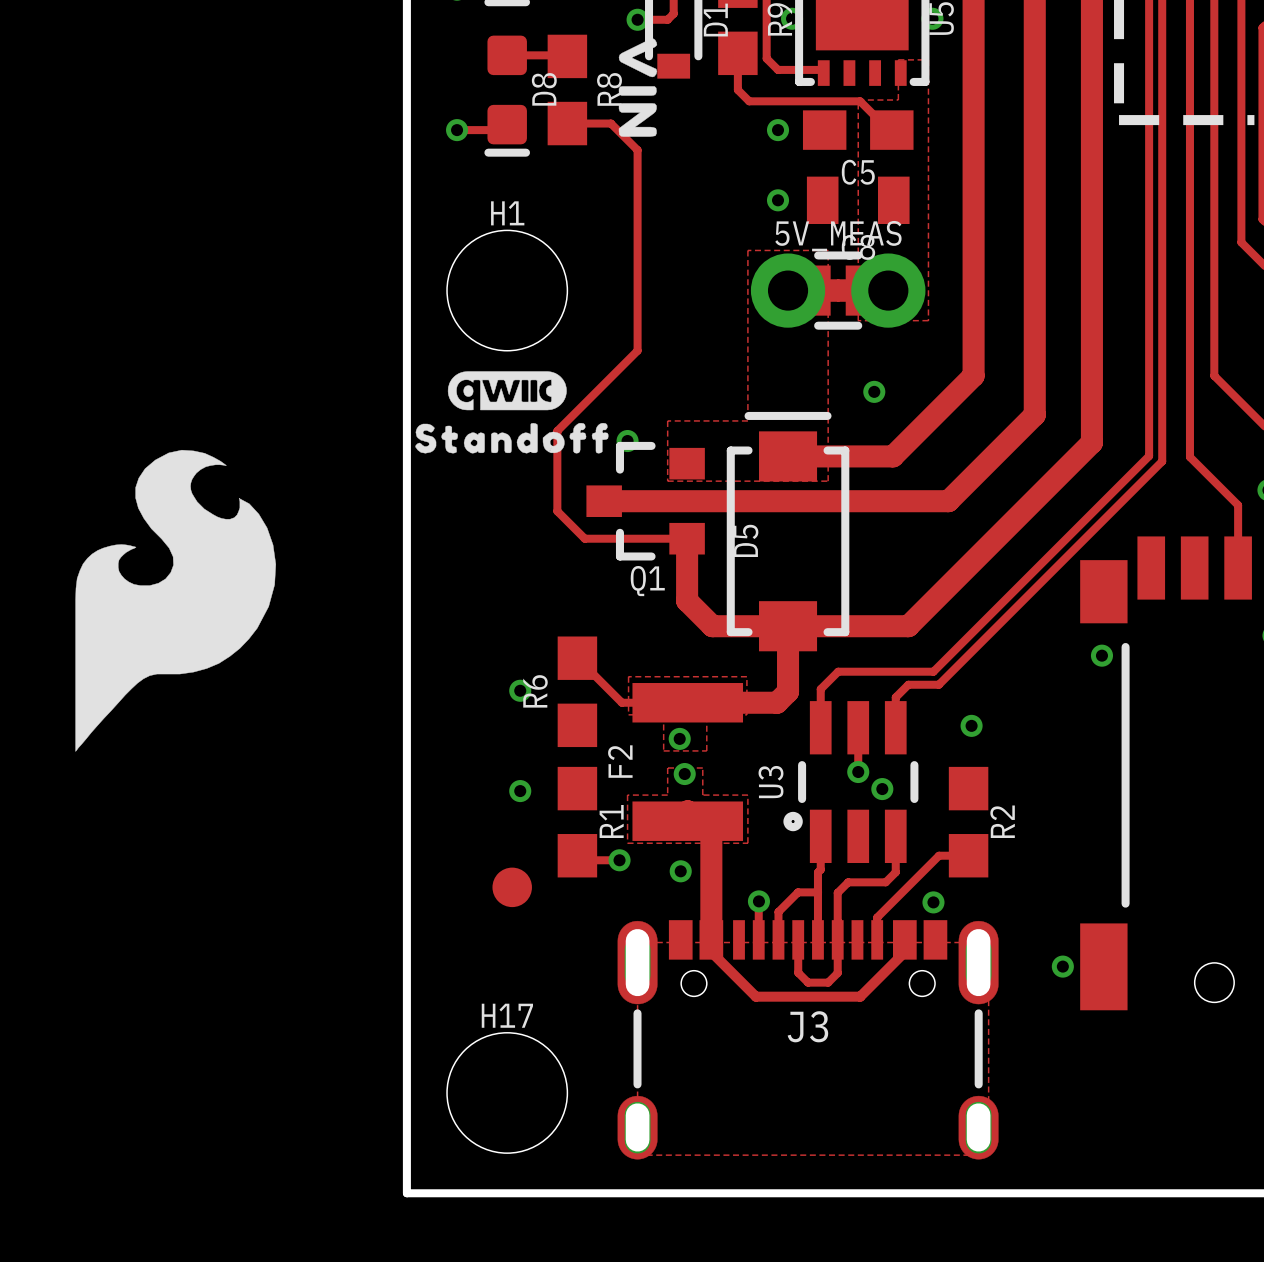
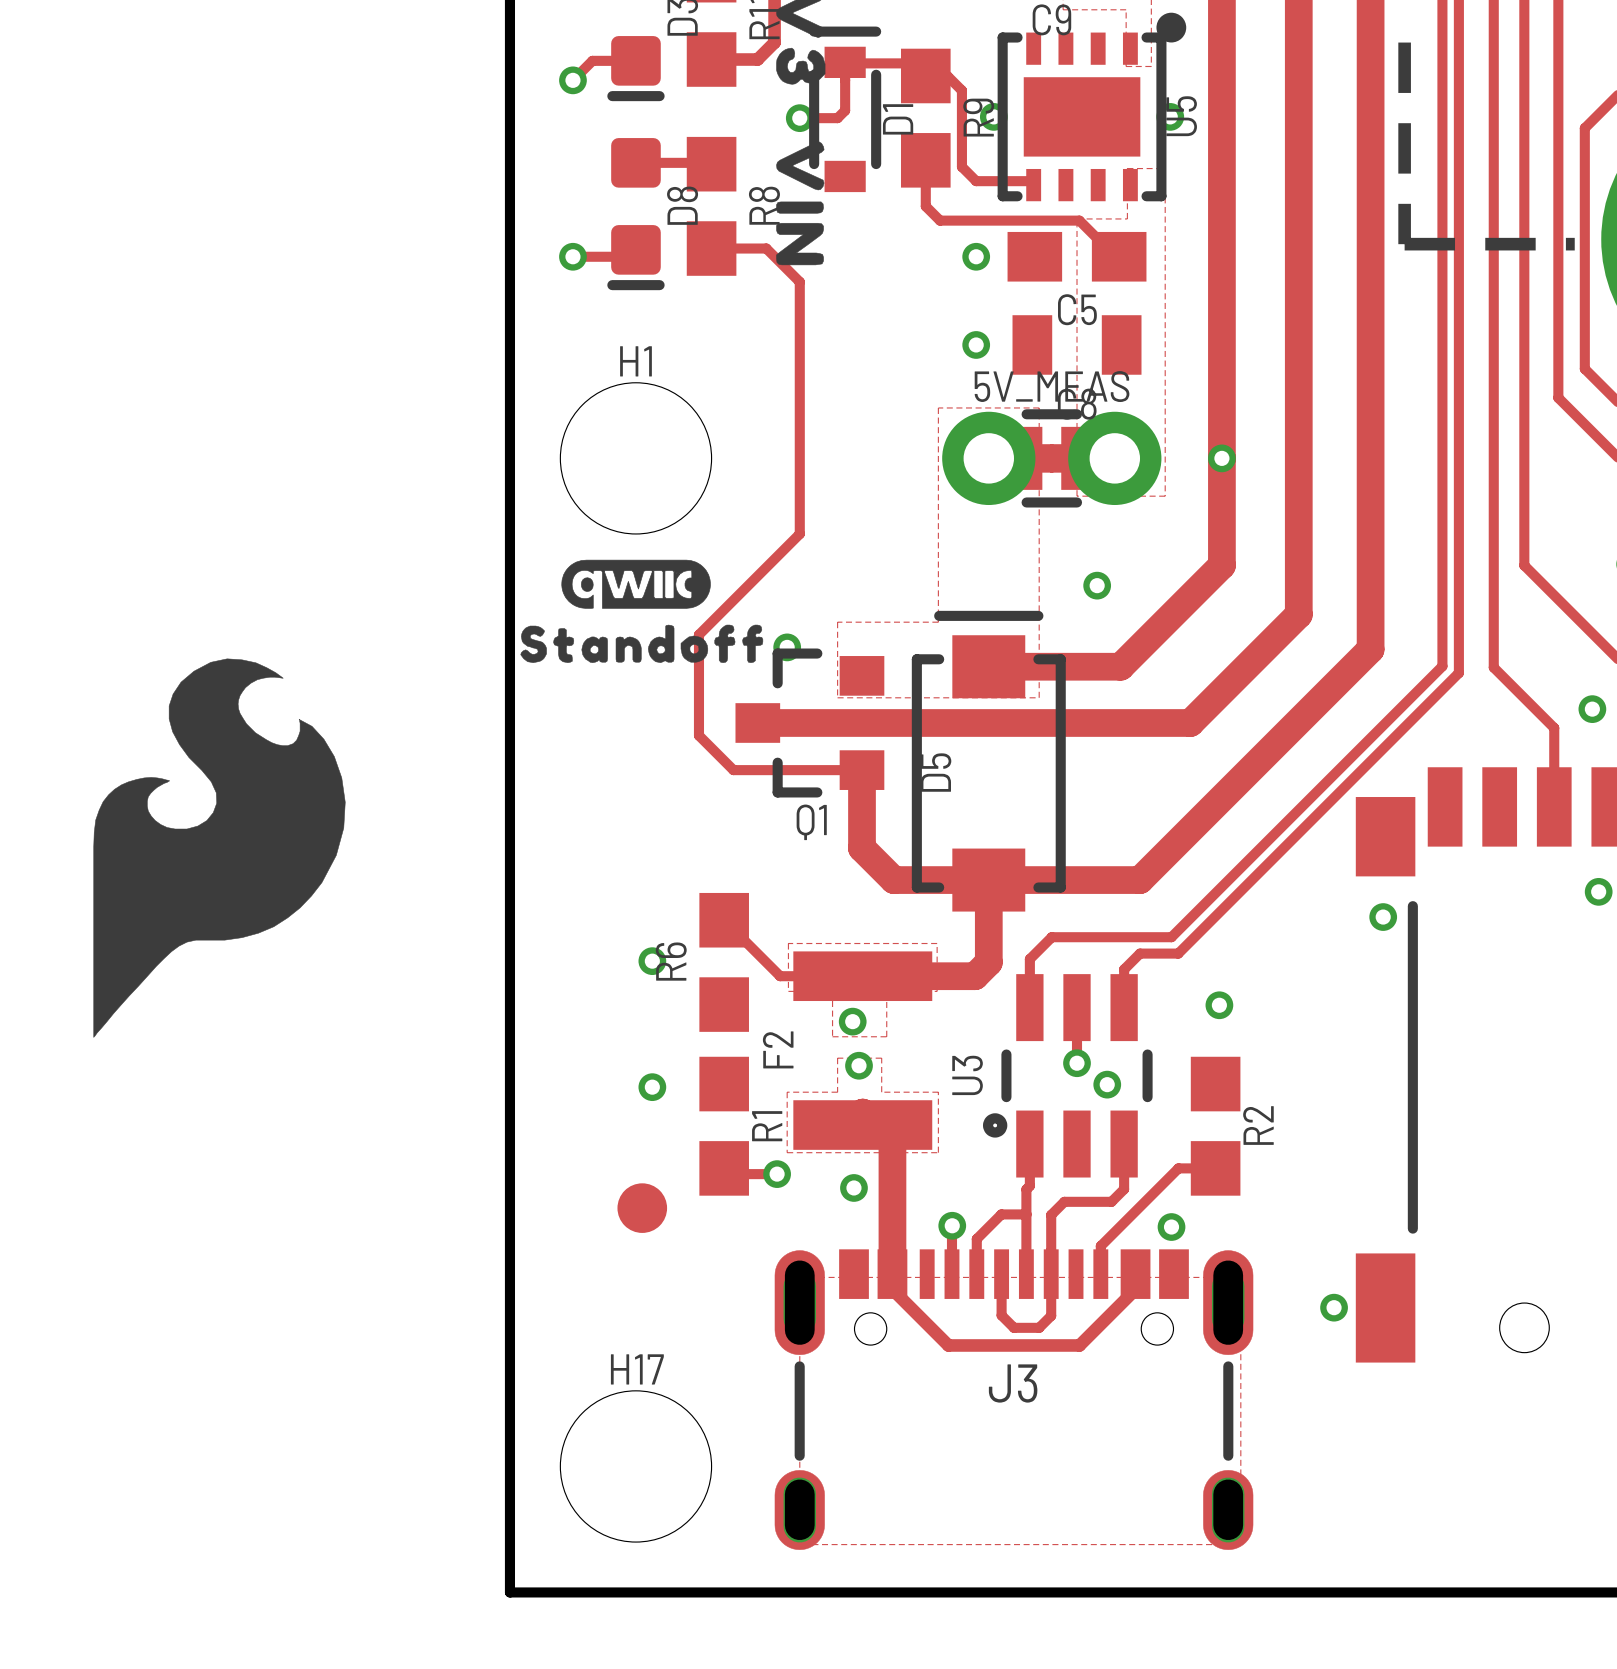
via: none -> (1221, 458)

